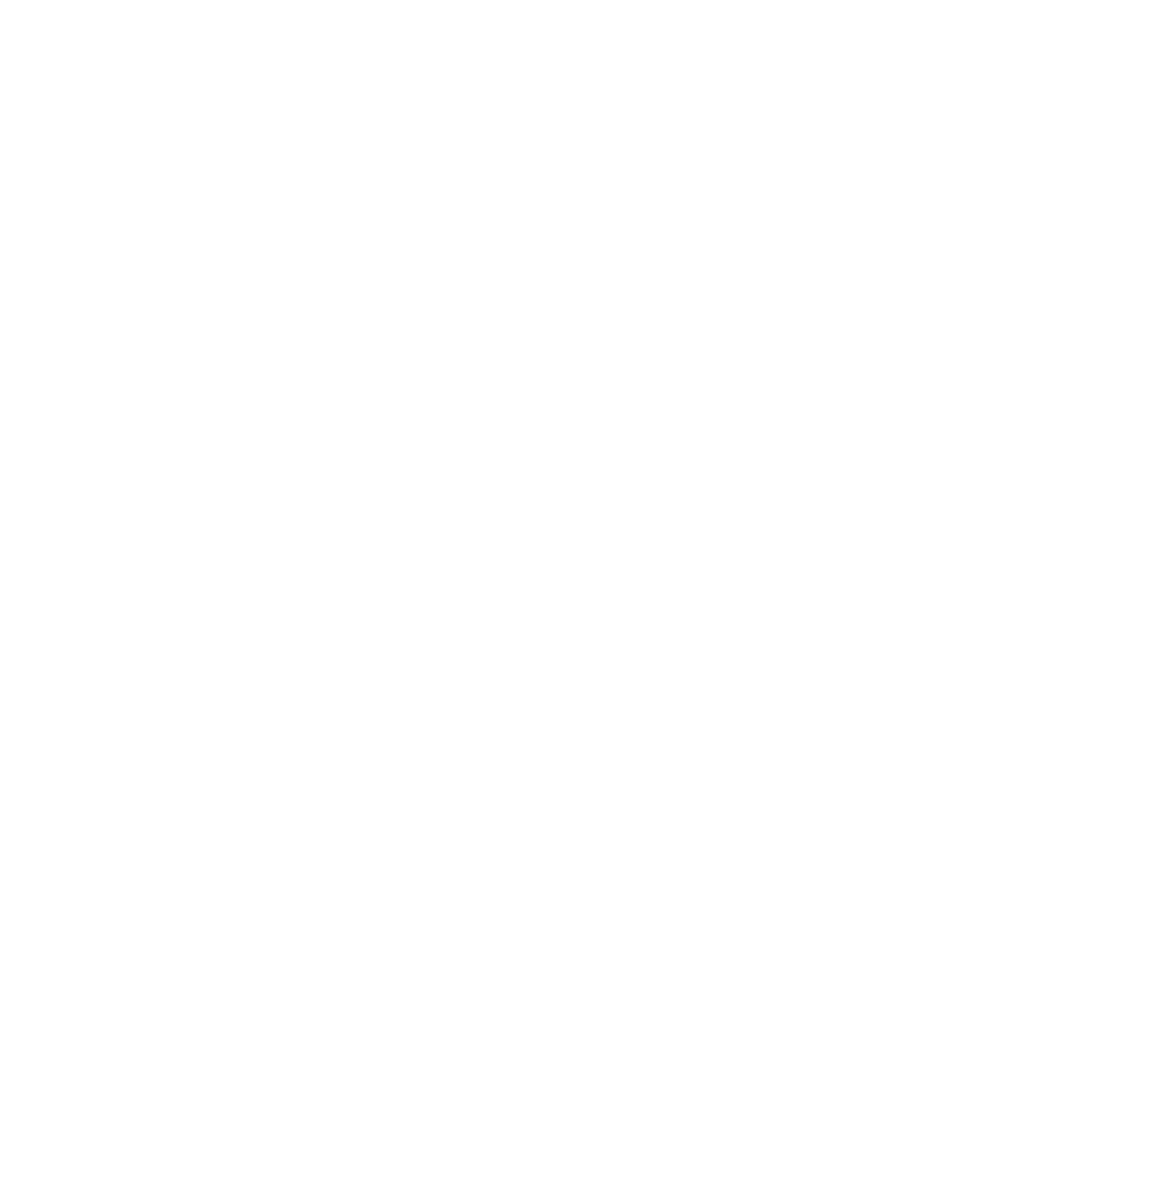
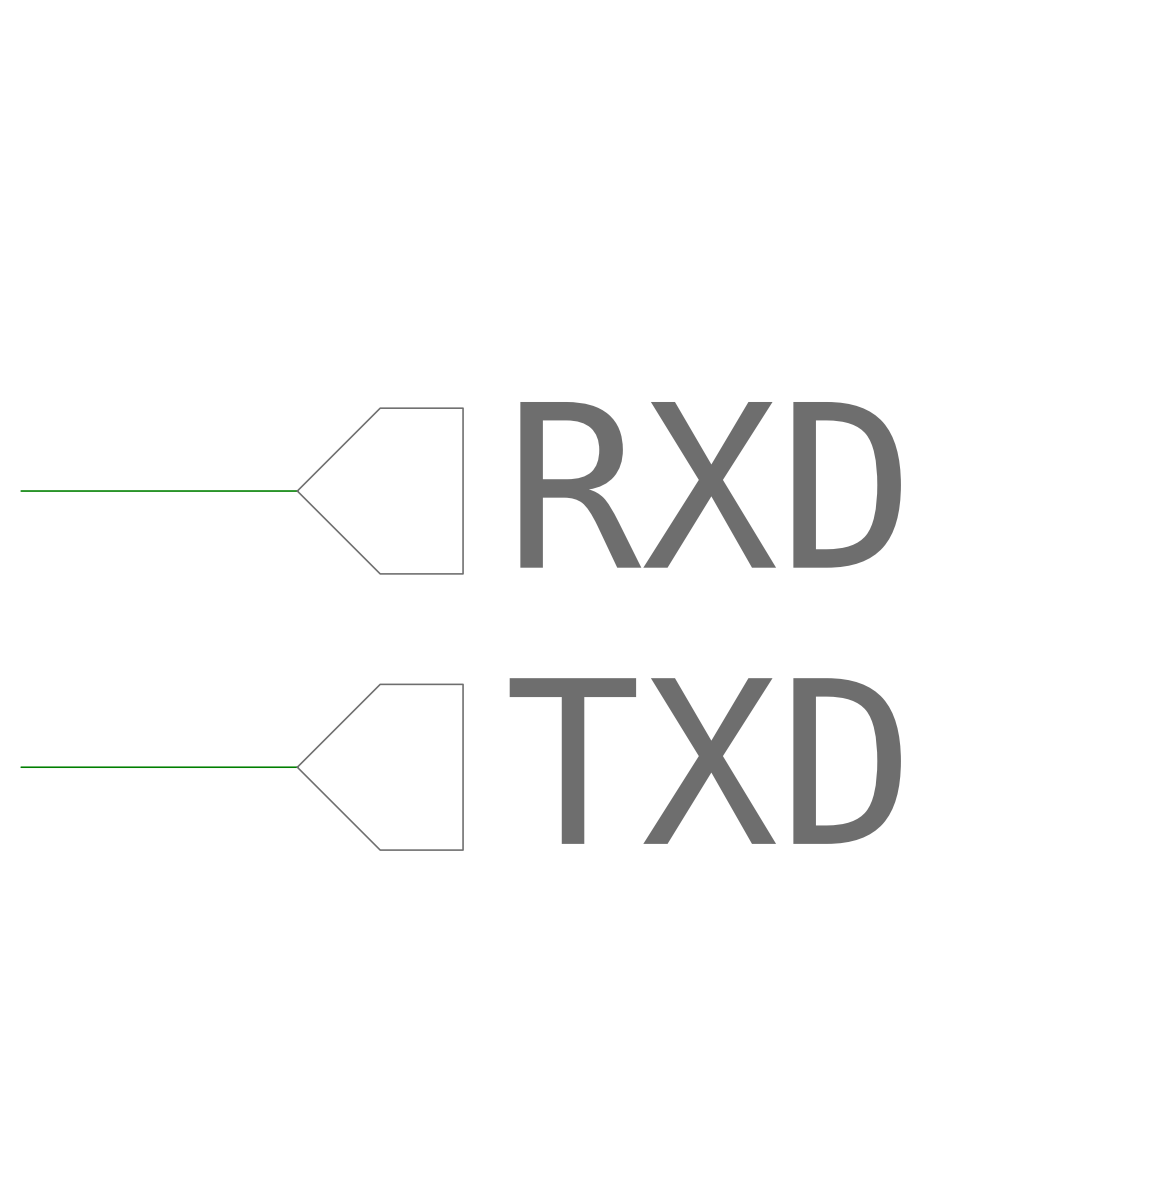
hierarchical label: none -> RXD (710, 484)
wire: none -> (21, 491) (297, 491)
hierarchical label: none -> TXD (705, 761)
wire: none -> (21, 767) (297, 767)

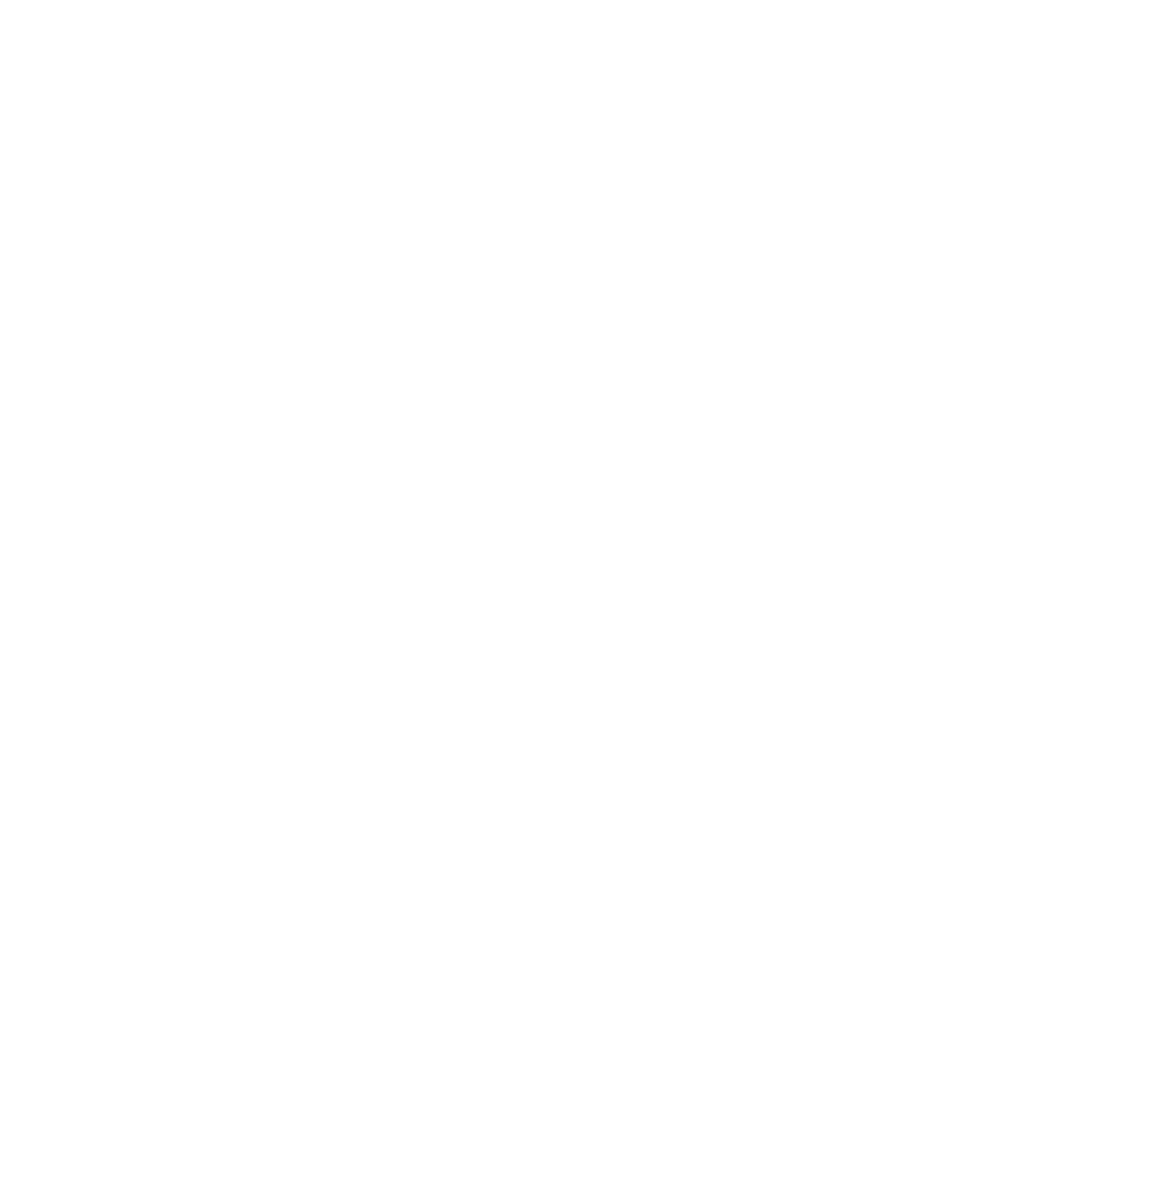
hierarchical label: RXD (710, 484) -> none
wire: (21, 491) (297, 491) -> none
hierarchical label: TXD (705, 761) -> none
wire: (21, 767) (297, 767) -> none

